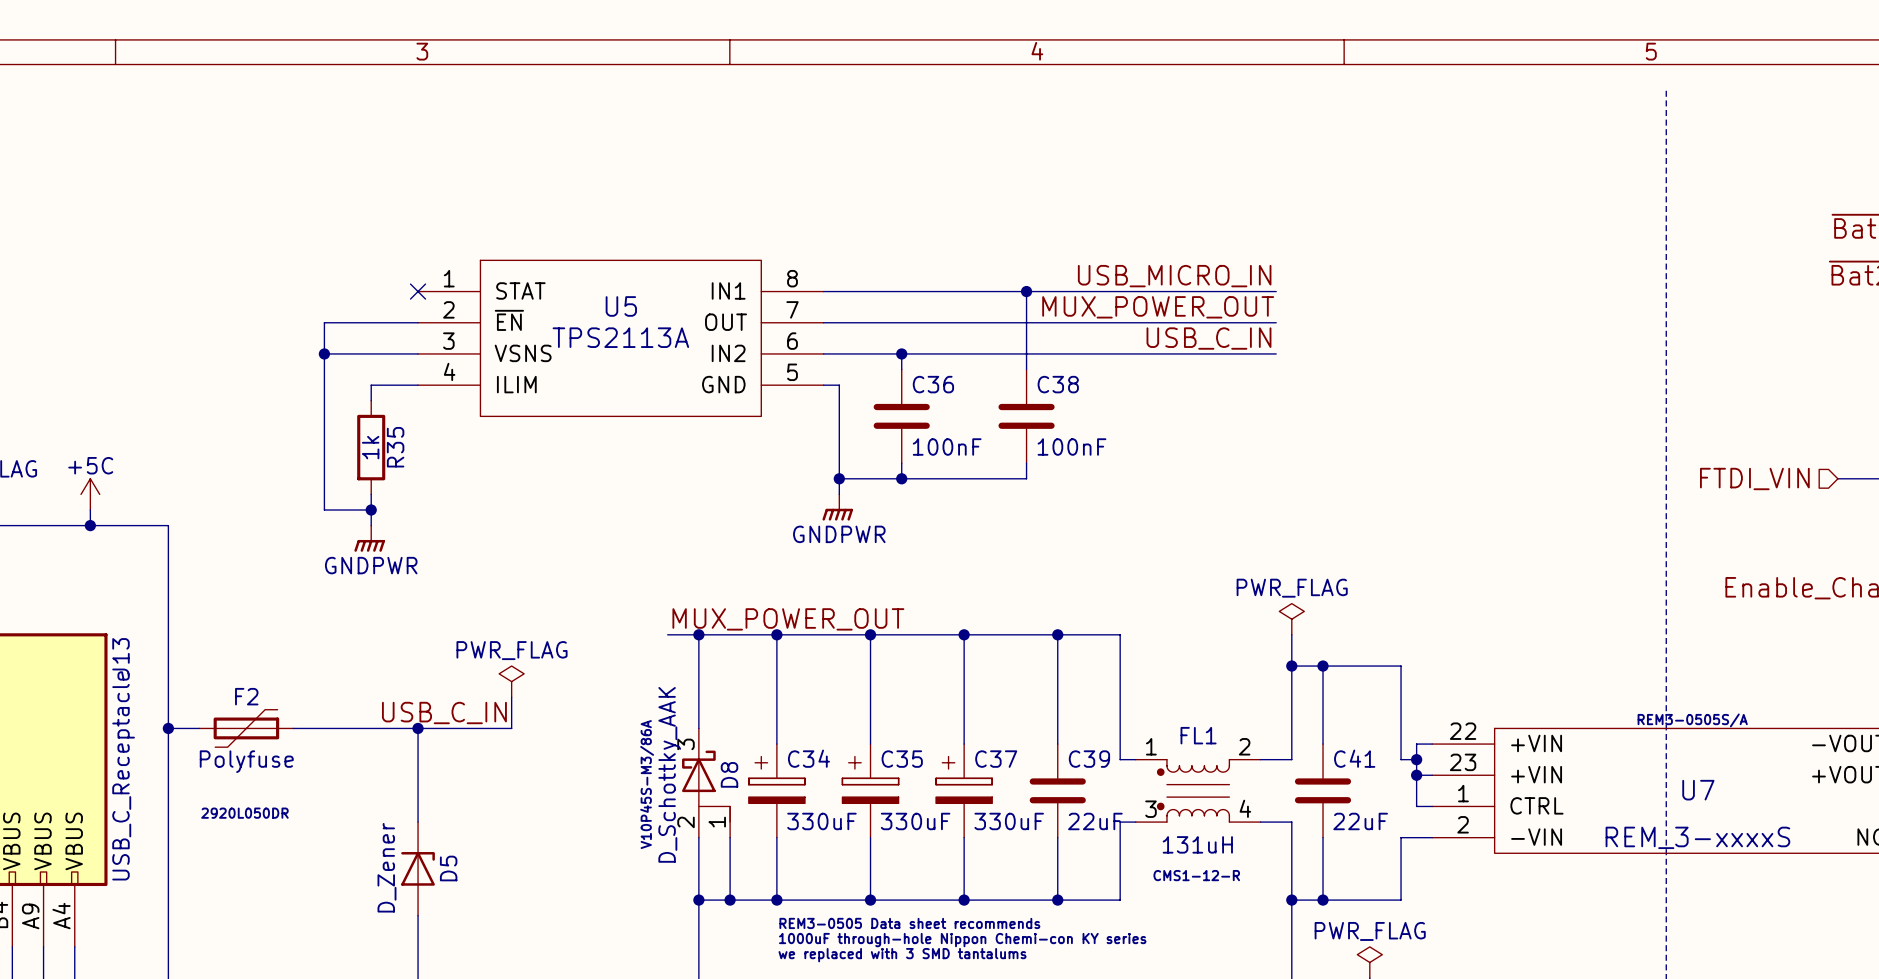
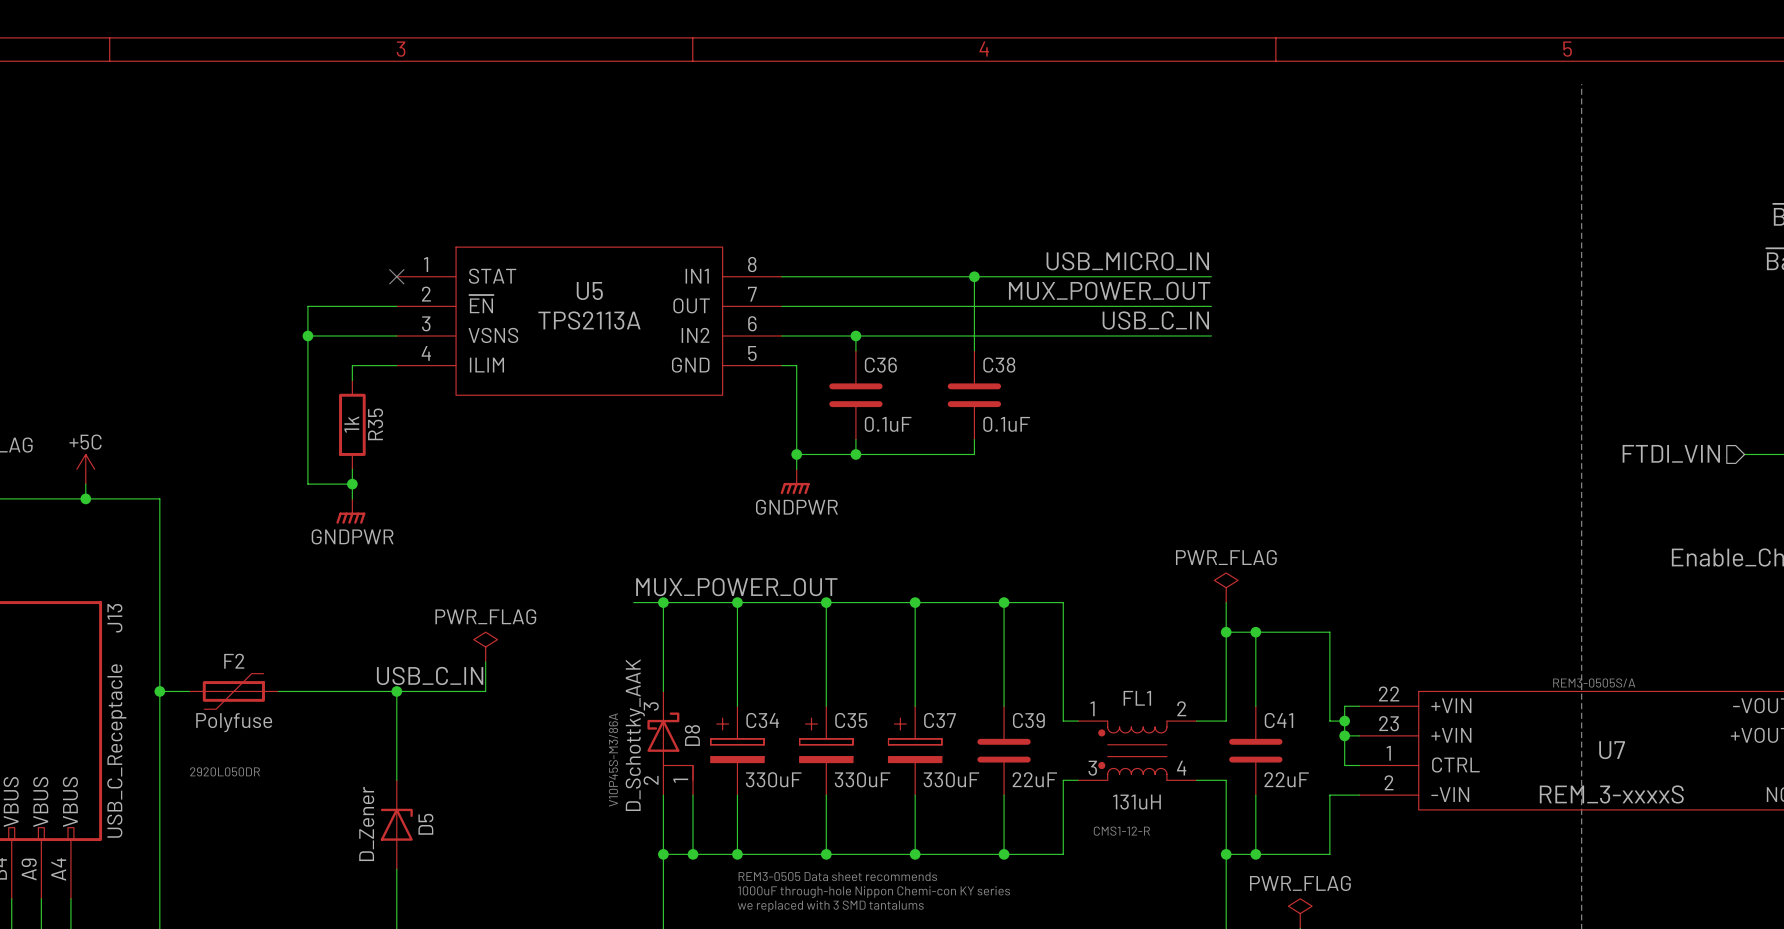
C36 value: 100nF (947, 447) -> 0.1uF (888, 424)
C38 value: 100nF (1071, 447) -> 0.1uF (1006, 424)

